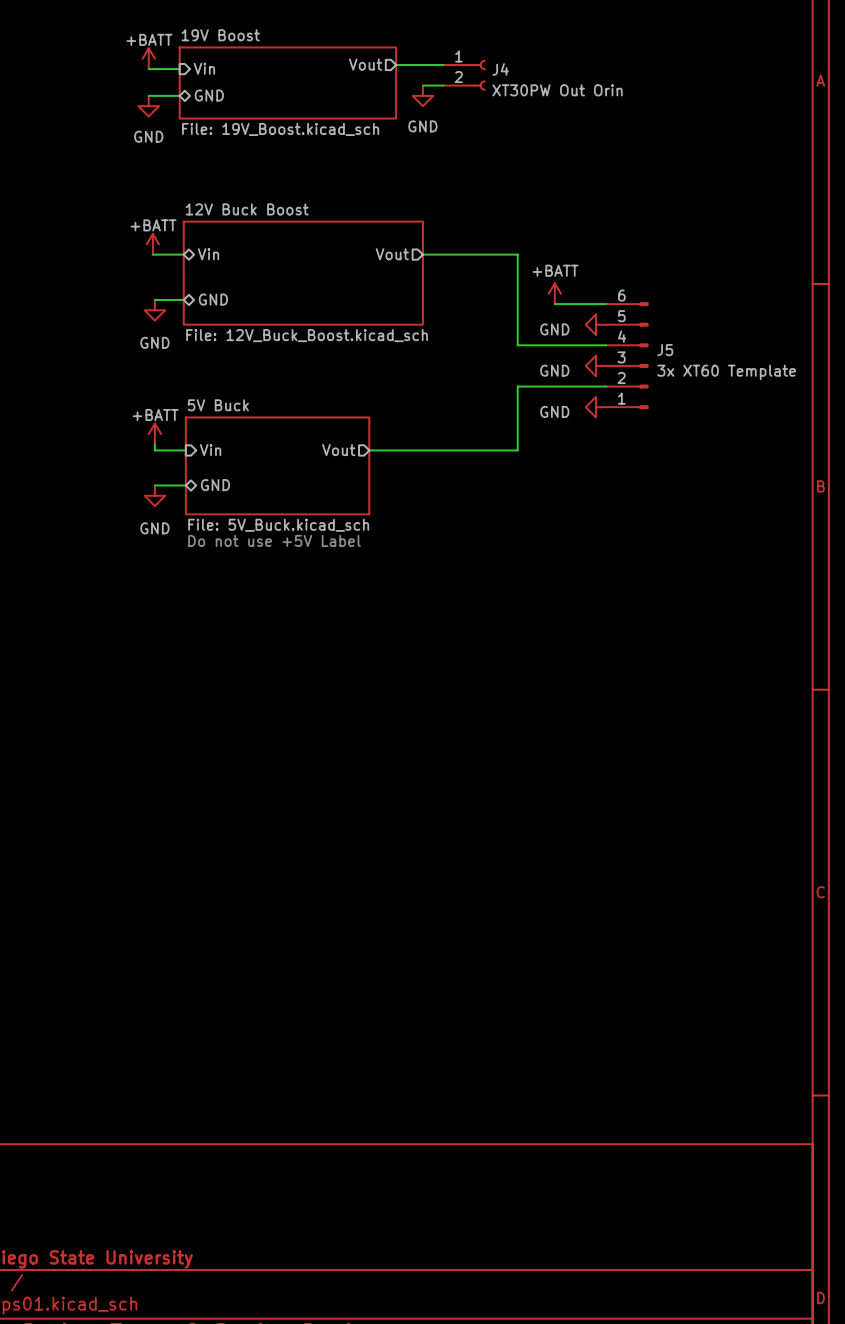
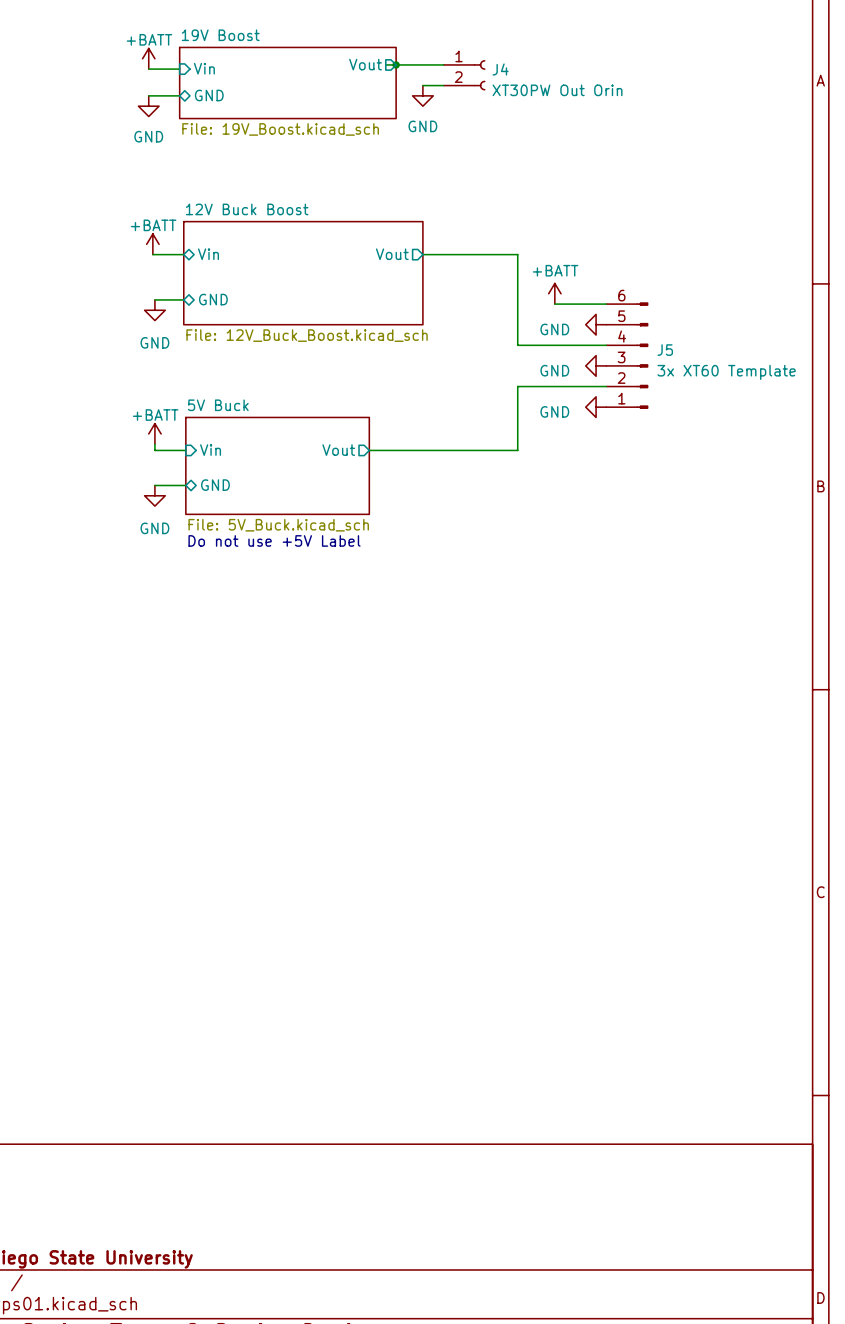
wire: none -> (385, 64) (396, 64)
junction: none -> (396, 64)

